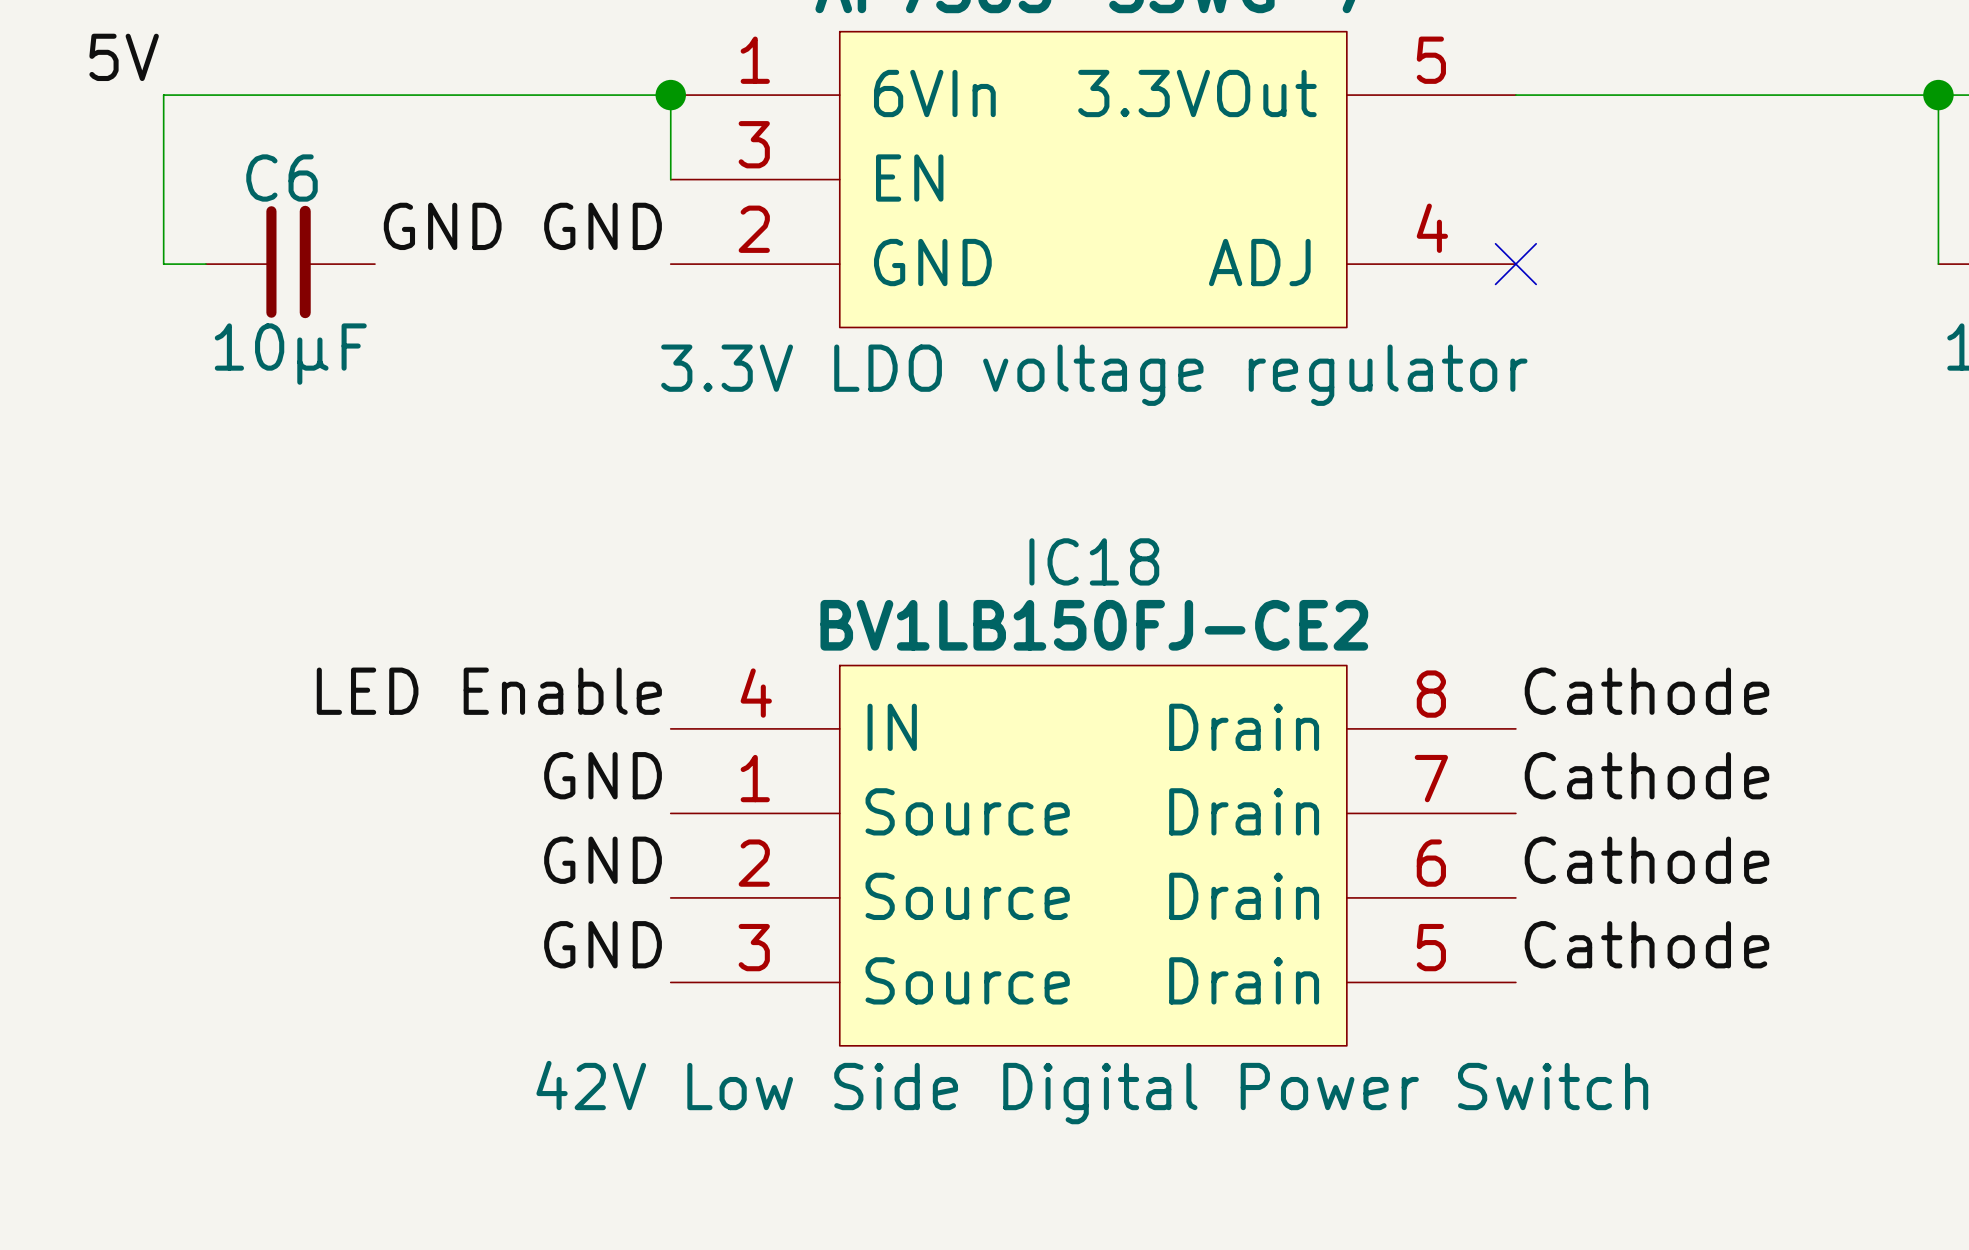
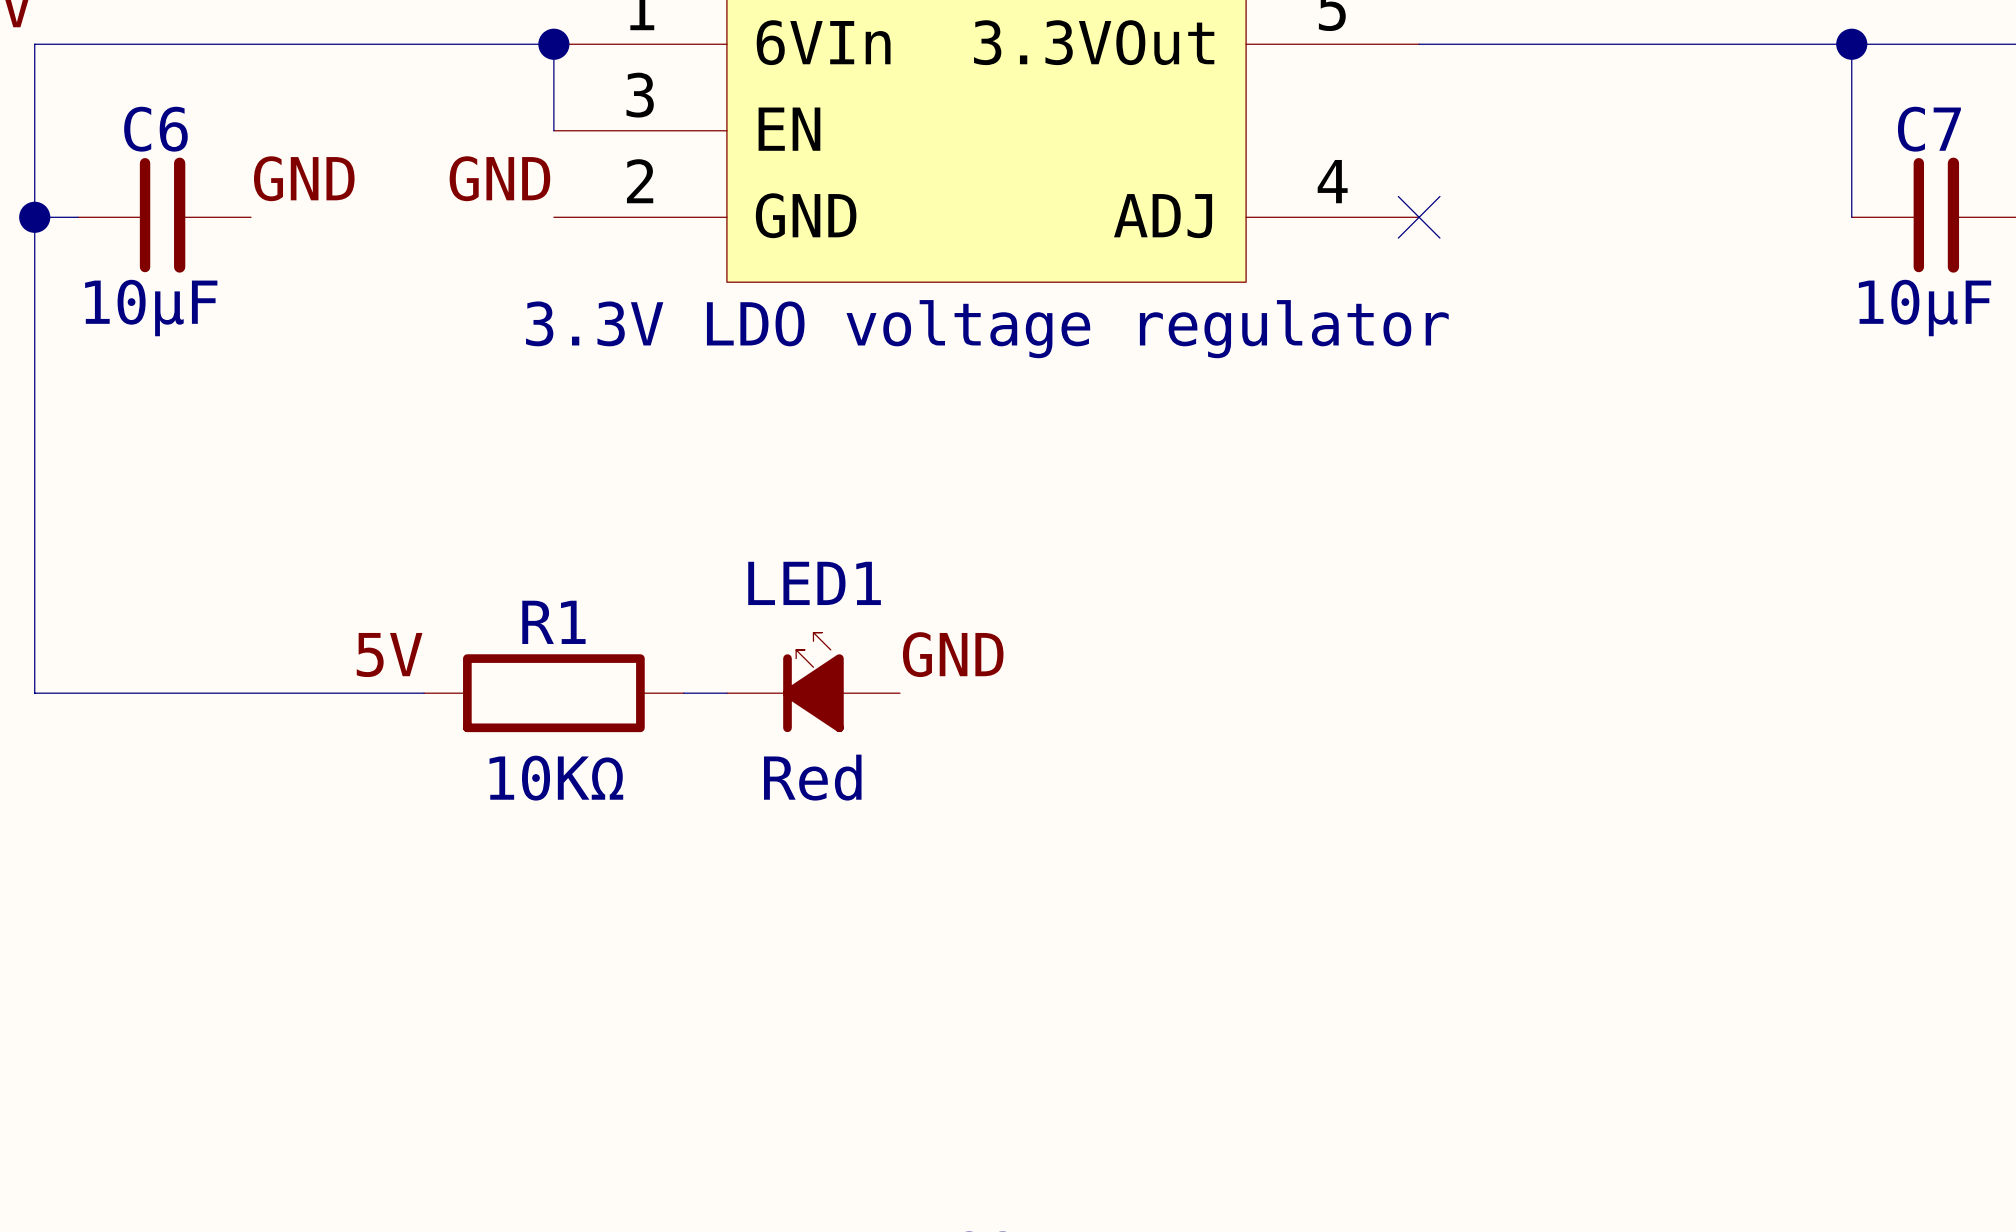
wire: none -> (34, 217) (34, 693) (424, 693)
junction: none -> (34, 217)
label: LED Enable (489, 691) -> none
label: none -> 5V (389, 655)
label: none -> GND (953, 654)
label: Cathode (1646, 691) -> none
LED1: none -> Red (813, 682)
R1: none -> 10KΩ (553, 693)
label: GND (603, 775) -> none
label: Cathode (1646, 775) -> none
IC18: BV1LB150FJ-CE2 (1093, 855) -> none
label: GND (603, 860) -> none
label: Cathode (1646, 860) -> none
label: GND (603, 944) -> none
label: Cathode (1646, 944) -> none

